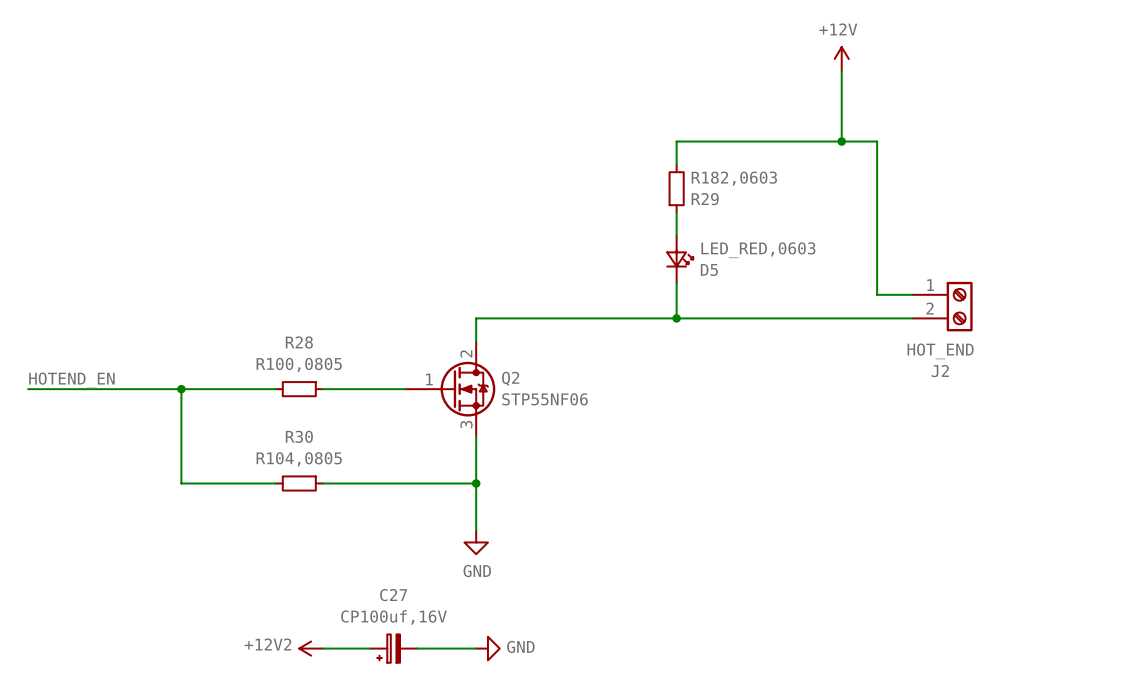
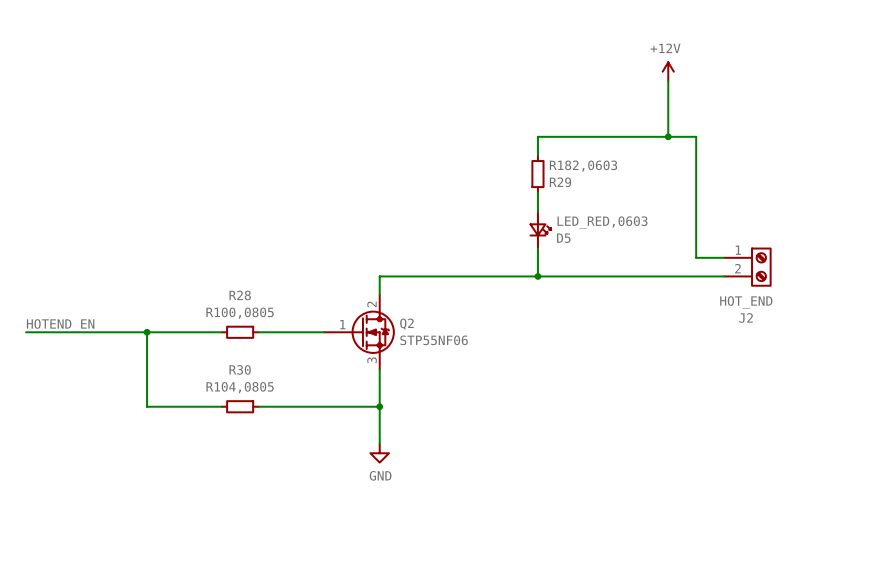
power symbol: +12V2 (311, 648) -> none
wire: (322, 648) (370, 648) -> none
C27: CP100uf,16V (393, 648) -> none
wire: (417, 648) (476, 648) -> none
power symbol: GND (487, 648) -> none

